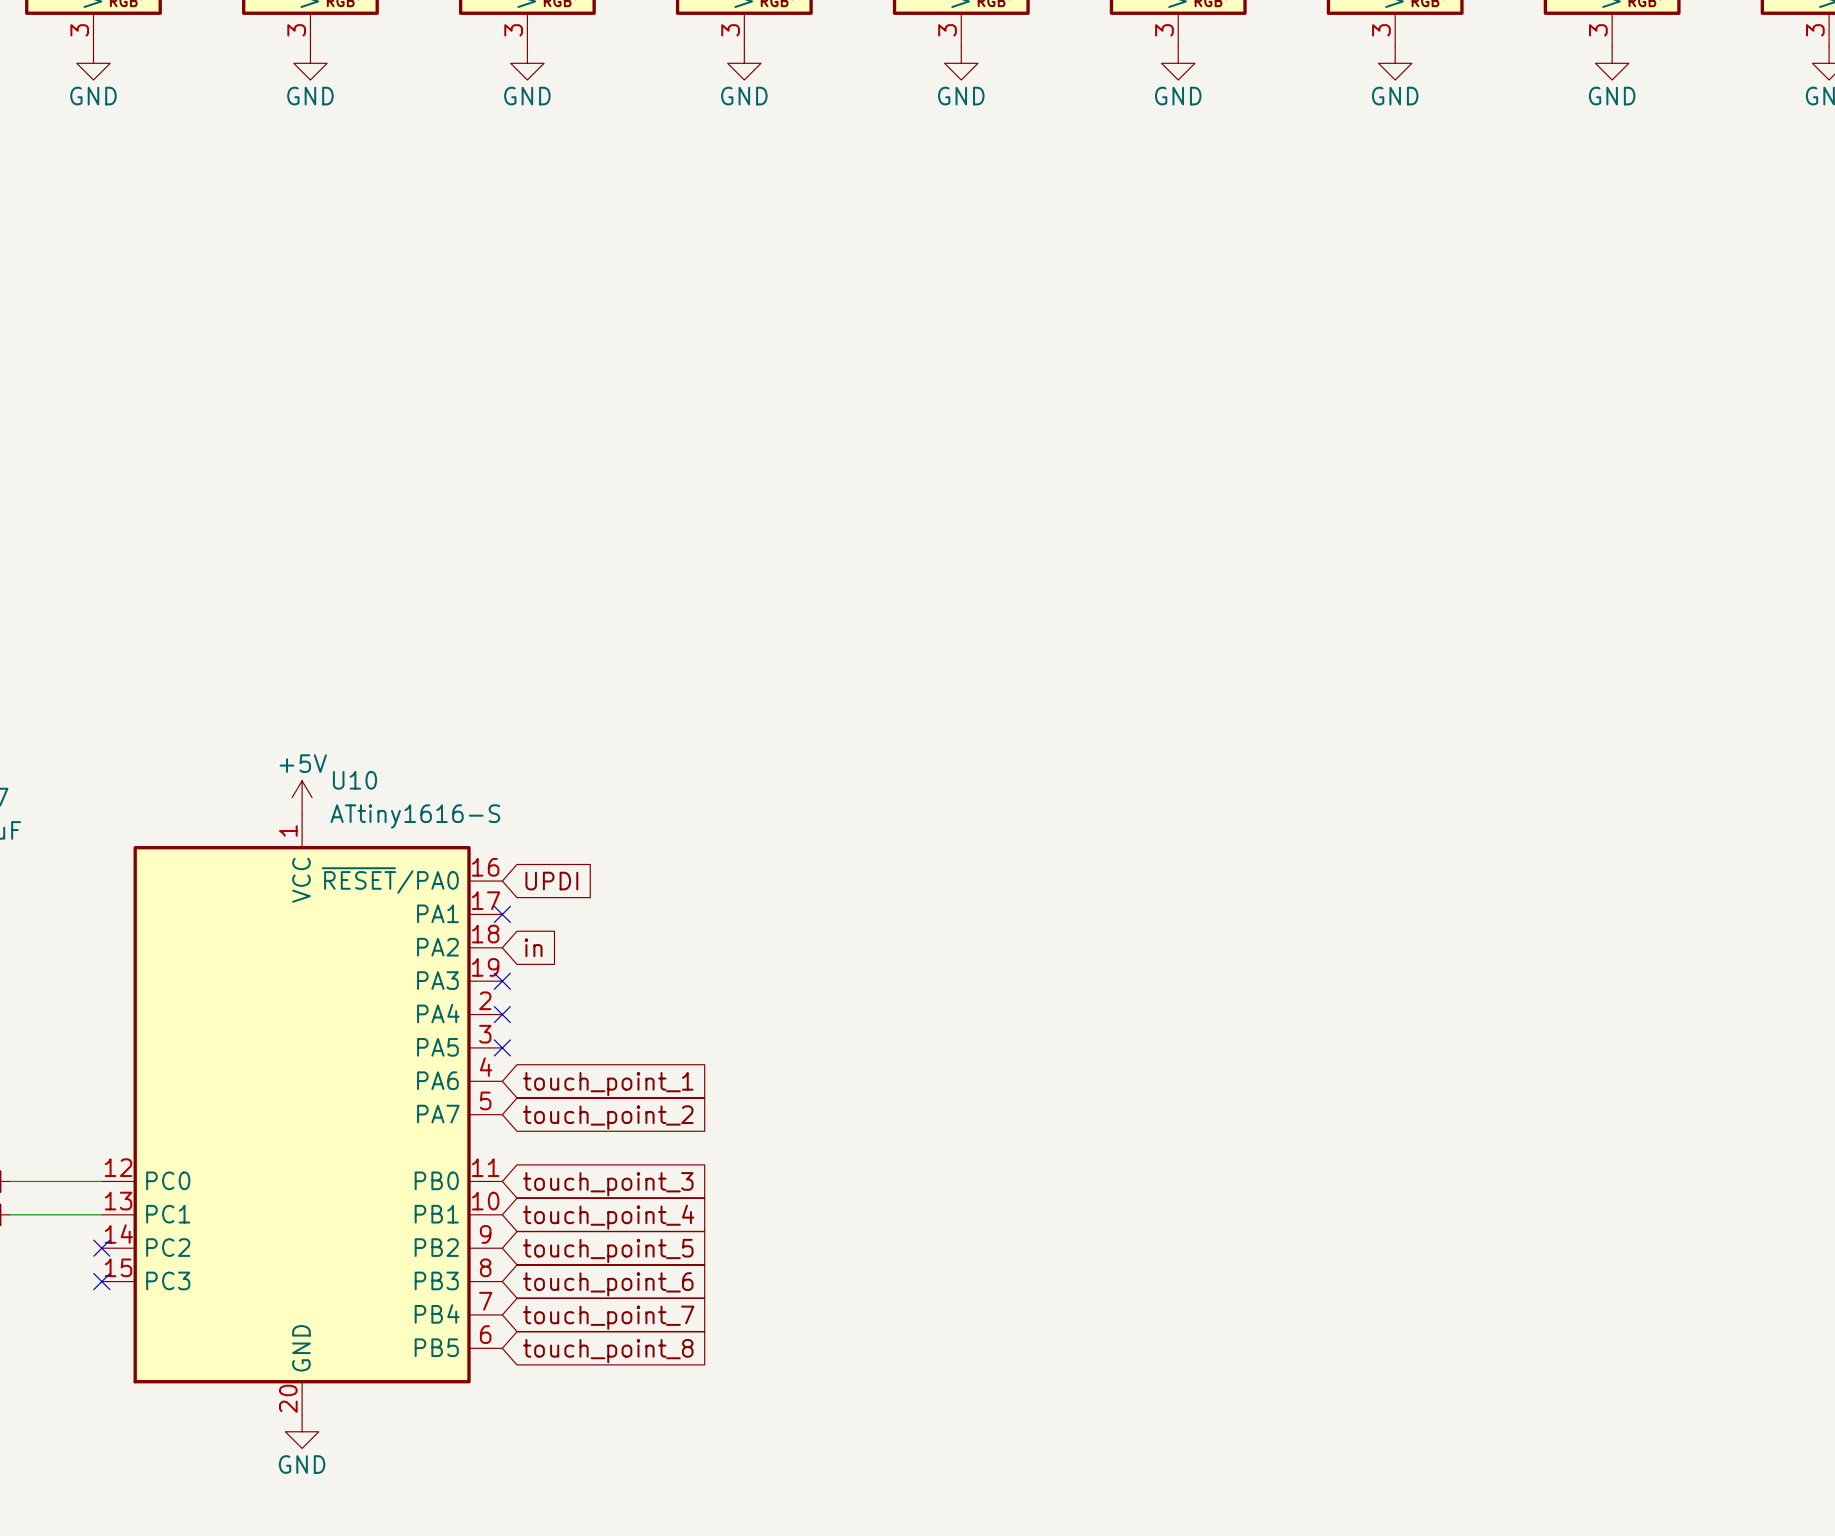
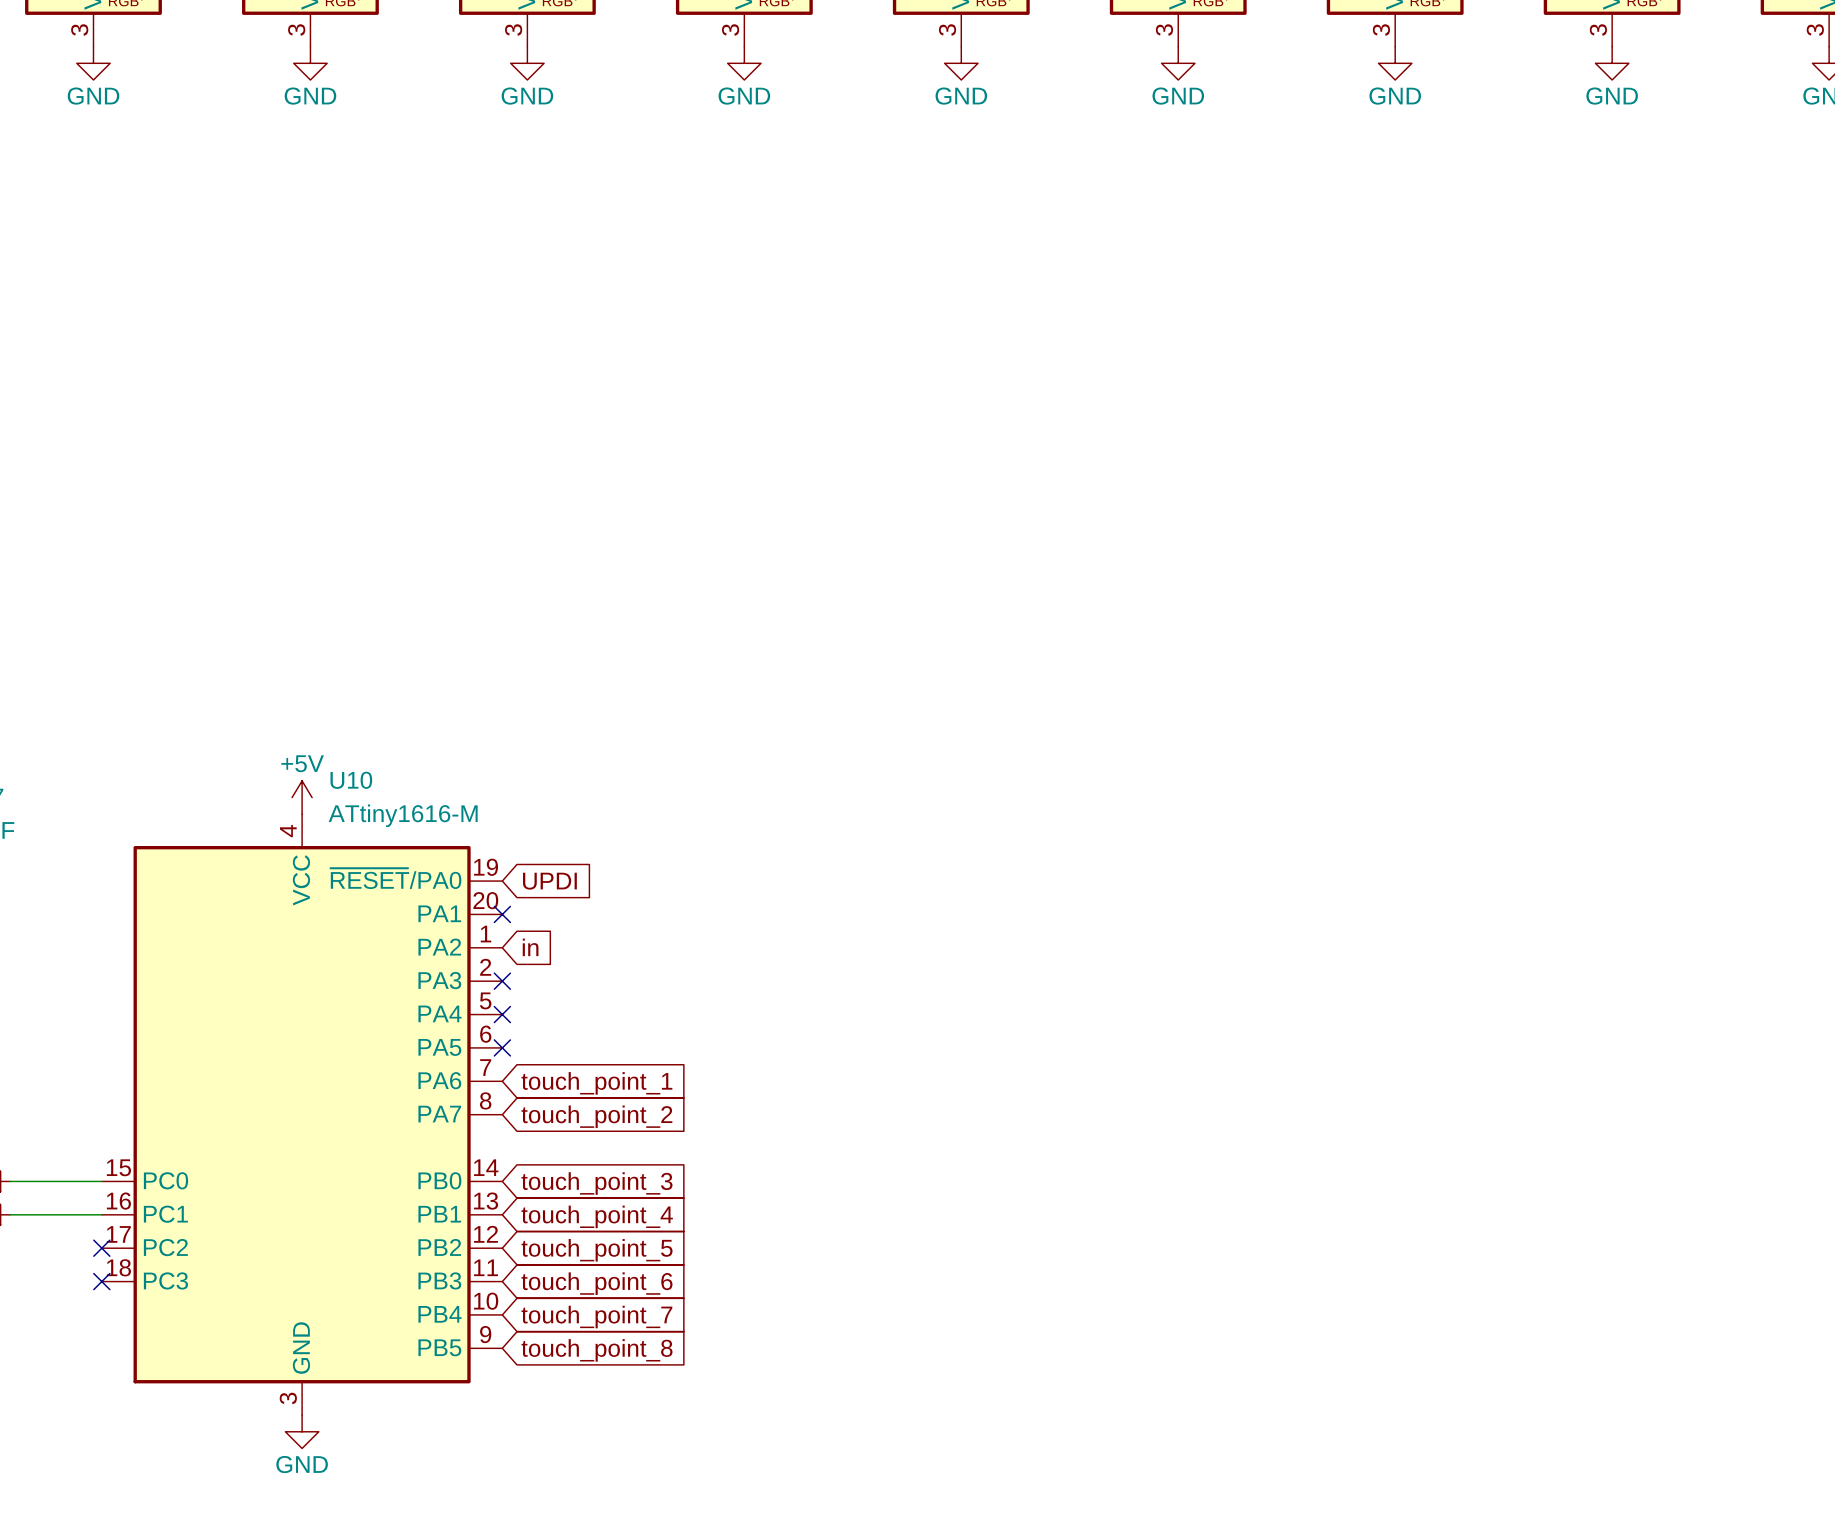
U10 symbol: [101, 814, 503, 1416] -> [101, 814, 503, 1416]
U10 value: ATtiny1616-S (415, 816) -> ATtiny1616-M (403, 815)

